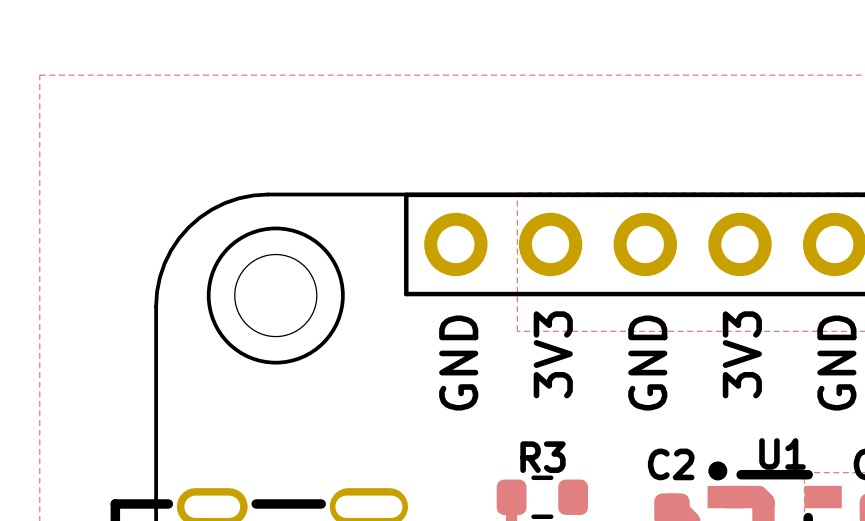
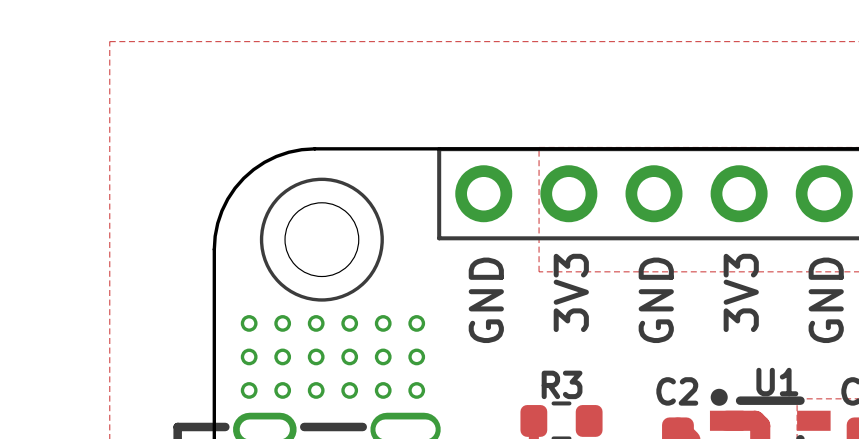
via: none -> (249, 323)
via: none -> (282, 323)
via: none -> (316, 323)
via: none -> (349, 323)
via: none -> (383, 323)
via: none -> (416, 323)
via: none -> (249, 356)
via: none -> (282, 356)
via: none -> (316, 356)
via: none -> (349, 356)
via: none -> (383, 356)
via: none -> (416, 356)
via: none -> (249, 390)
via: none -> (282, 390)
via: none -> (316, 390)
via: none -> (349, 390)
via: none -> (383, 390)
via: none -> (416, 390)

